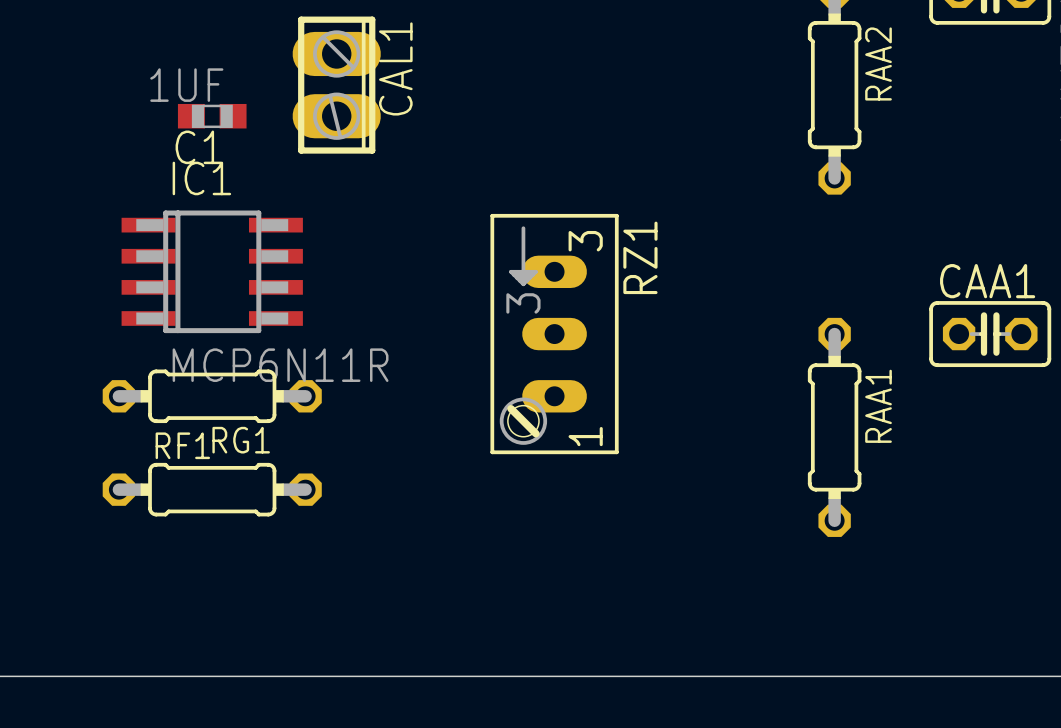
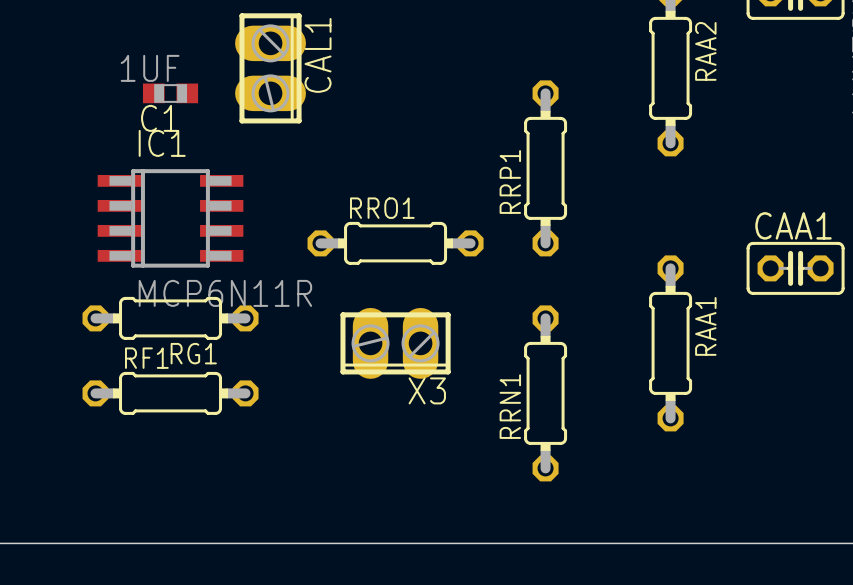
RRP1: none -> (545, 168)
RRO1: none -> (395, 243)
RZ1: (554, 334) -> none
X3: none -> (395, 343)
RRN1: none -> (545, 393)

